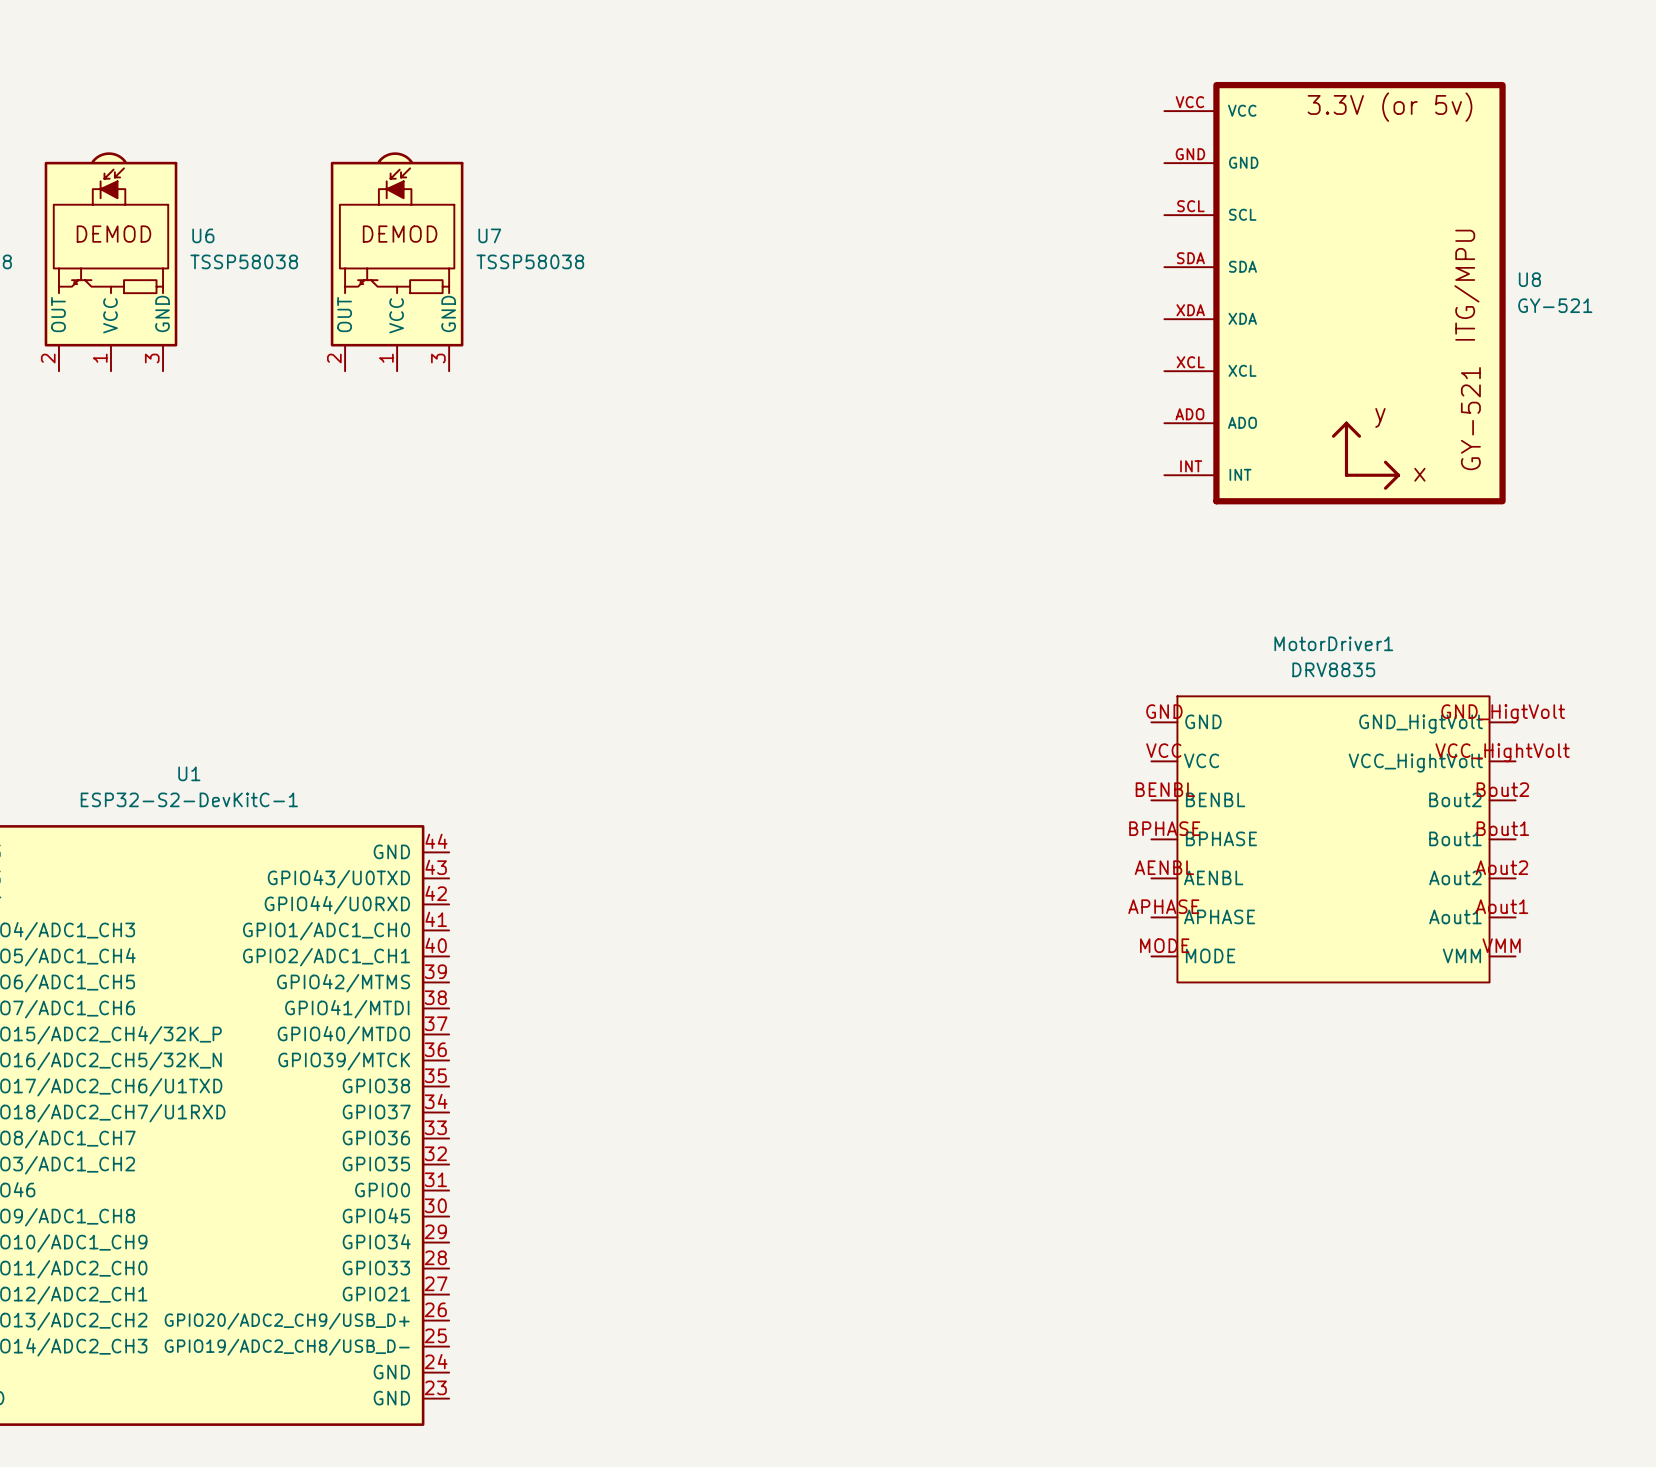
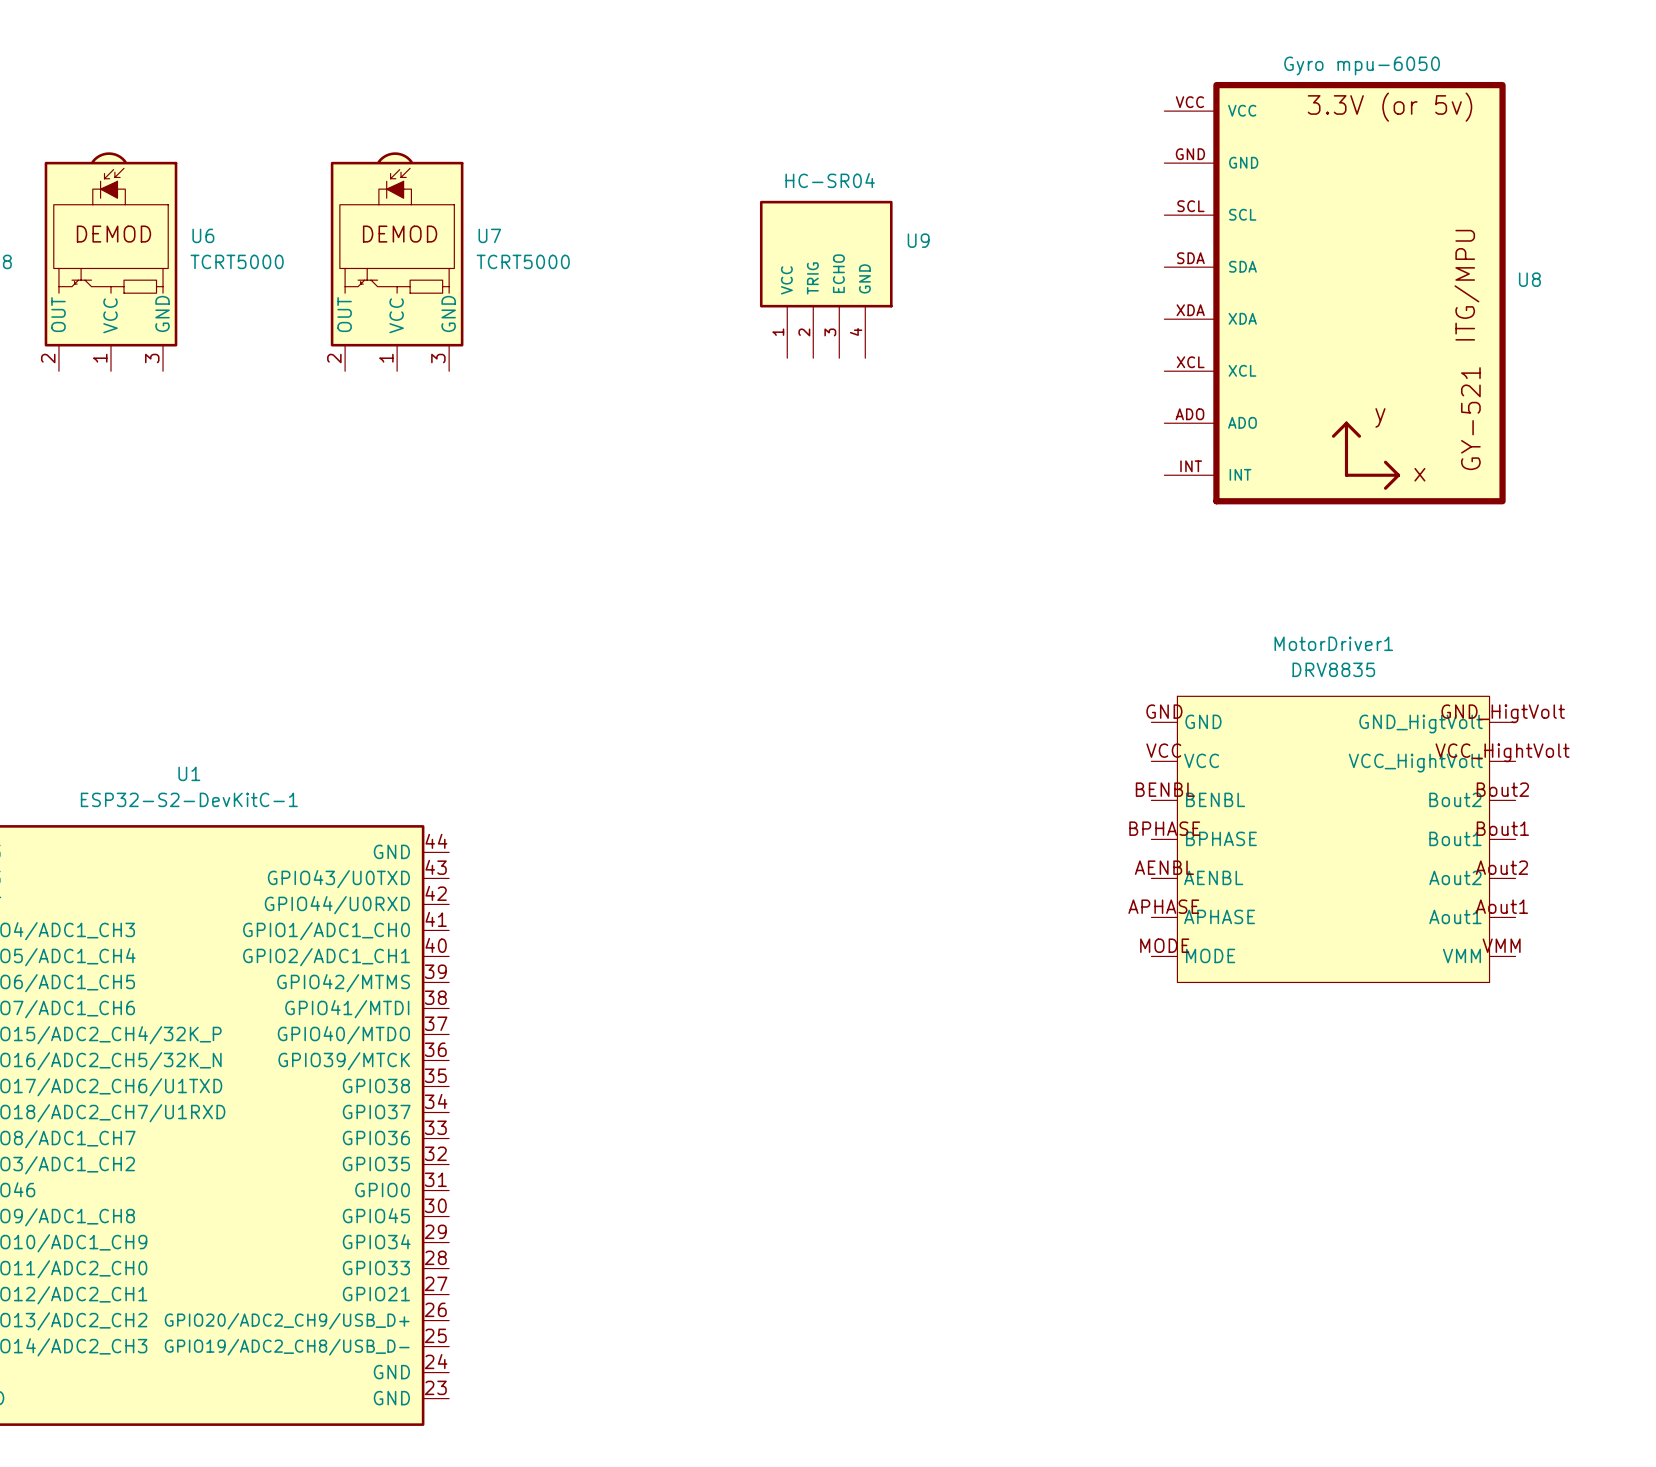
U6 value: TSSP58038 (244, 261) -> TCRT5000 (237, 261)
U7 value: TSSP58038 (530, 261) -> TCRT5000 (523, 261)
U9: none -> HC-SR04 (826, 279)
U8 value: GY-521 (1555, 305) -> Gyro mpu-6050 (1362, 65)

